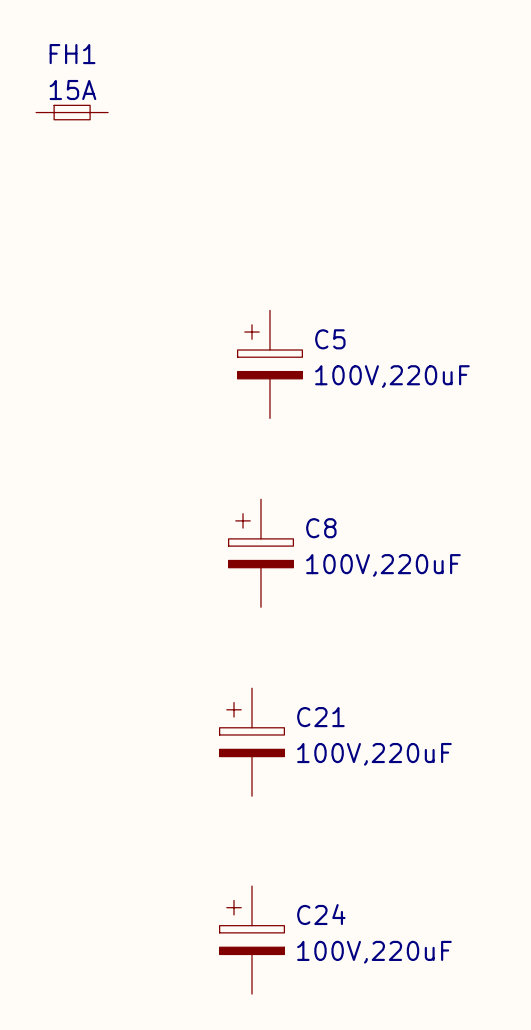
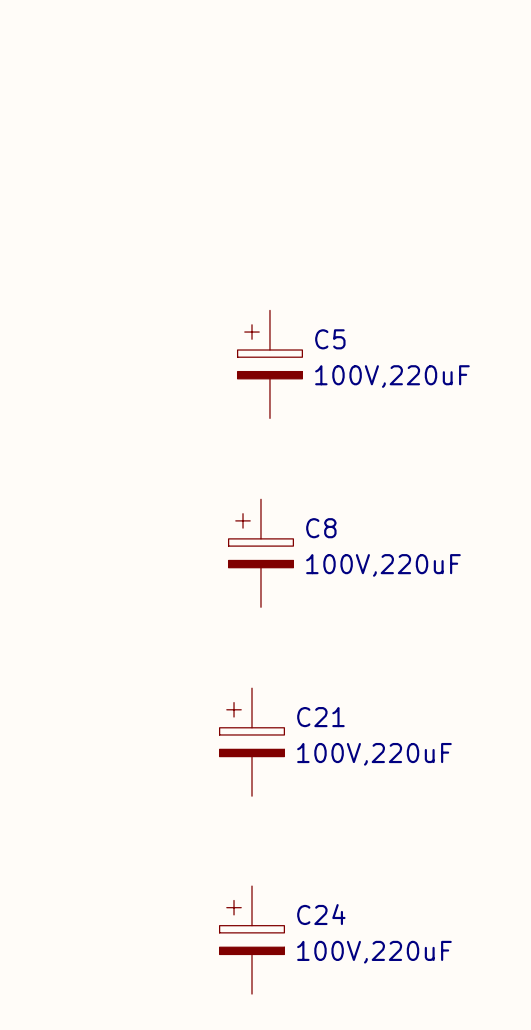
FH1: 15A (72, 112) -> none

